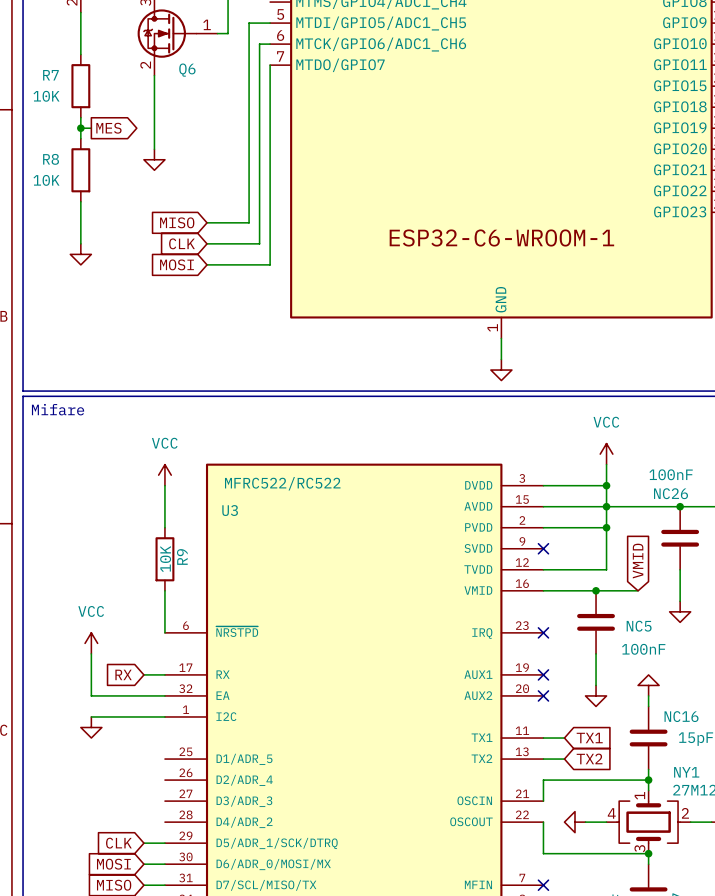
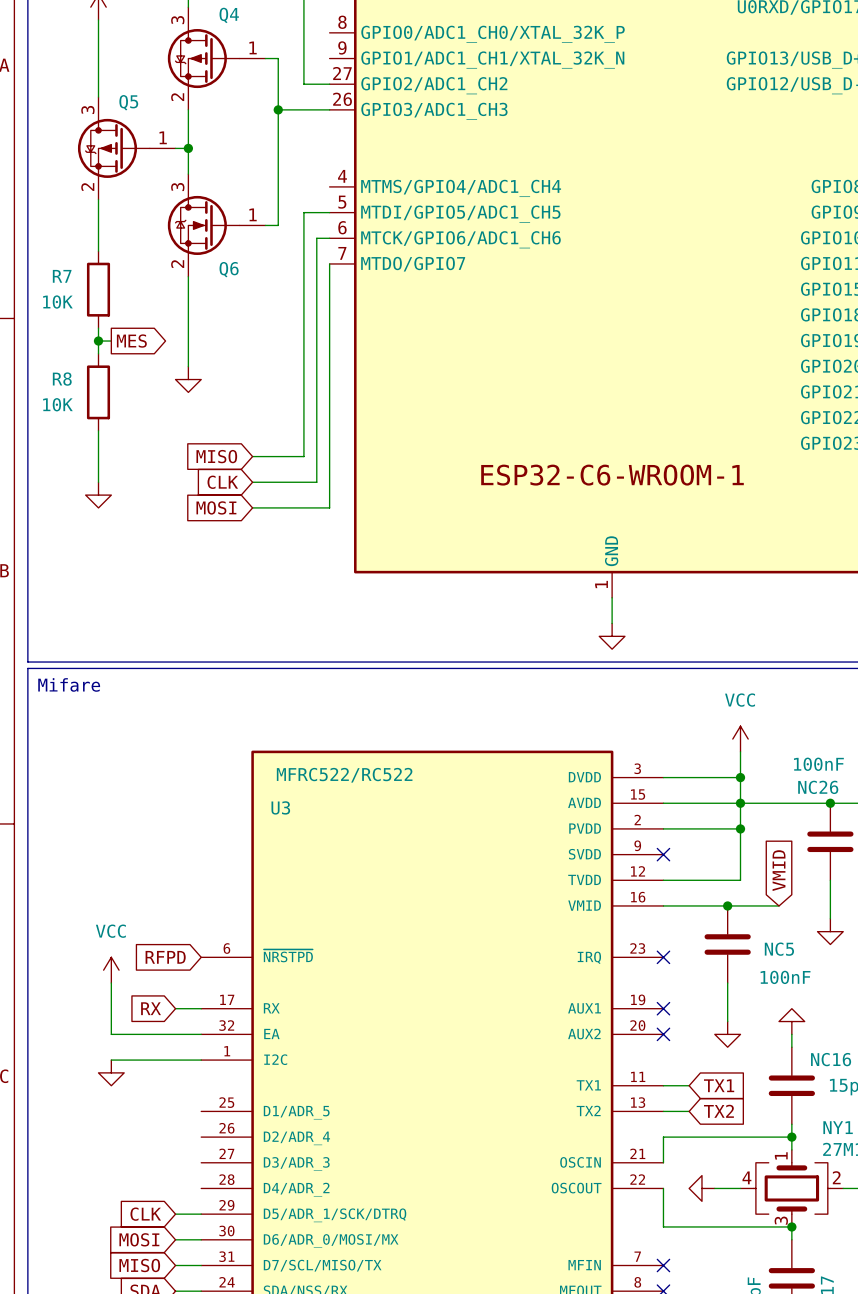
power symbol: VCC (164, 475) -> none
wire: (164, 485) (164, 527) -> none
R9: 10K (164, 559) -> none
wire: (164, 590) (164, 632) -> none
global label: none -> RFPD (165, 957)

